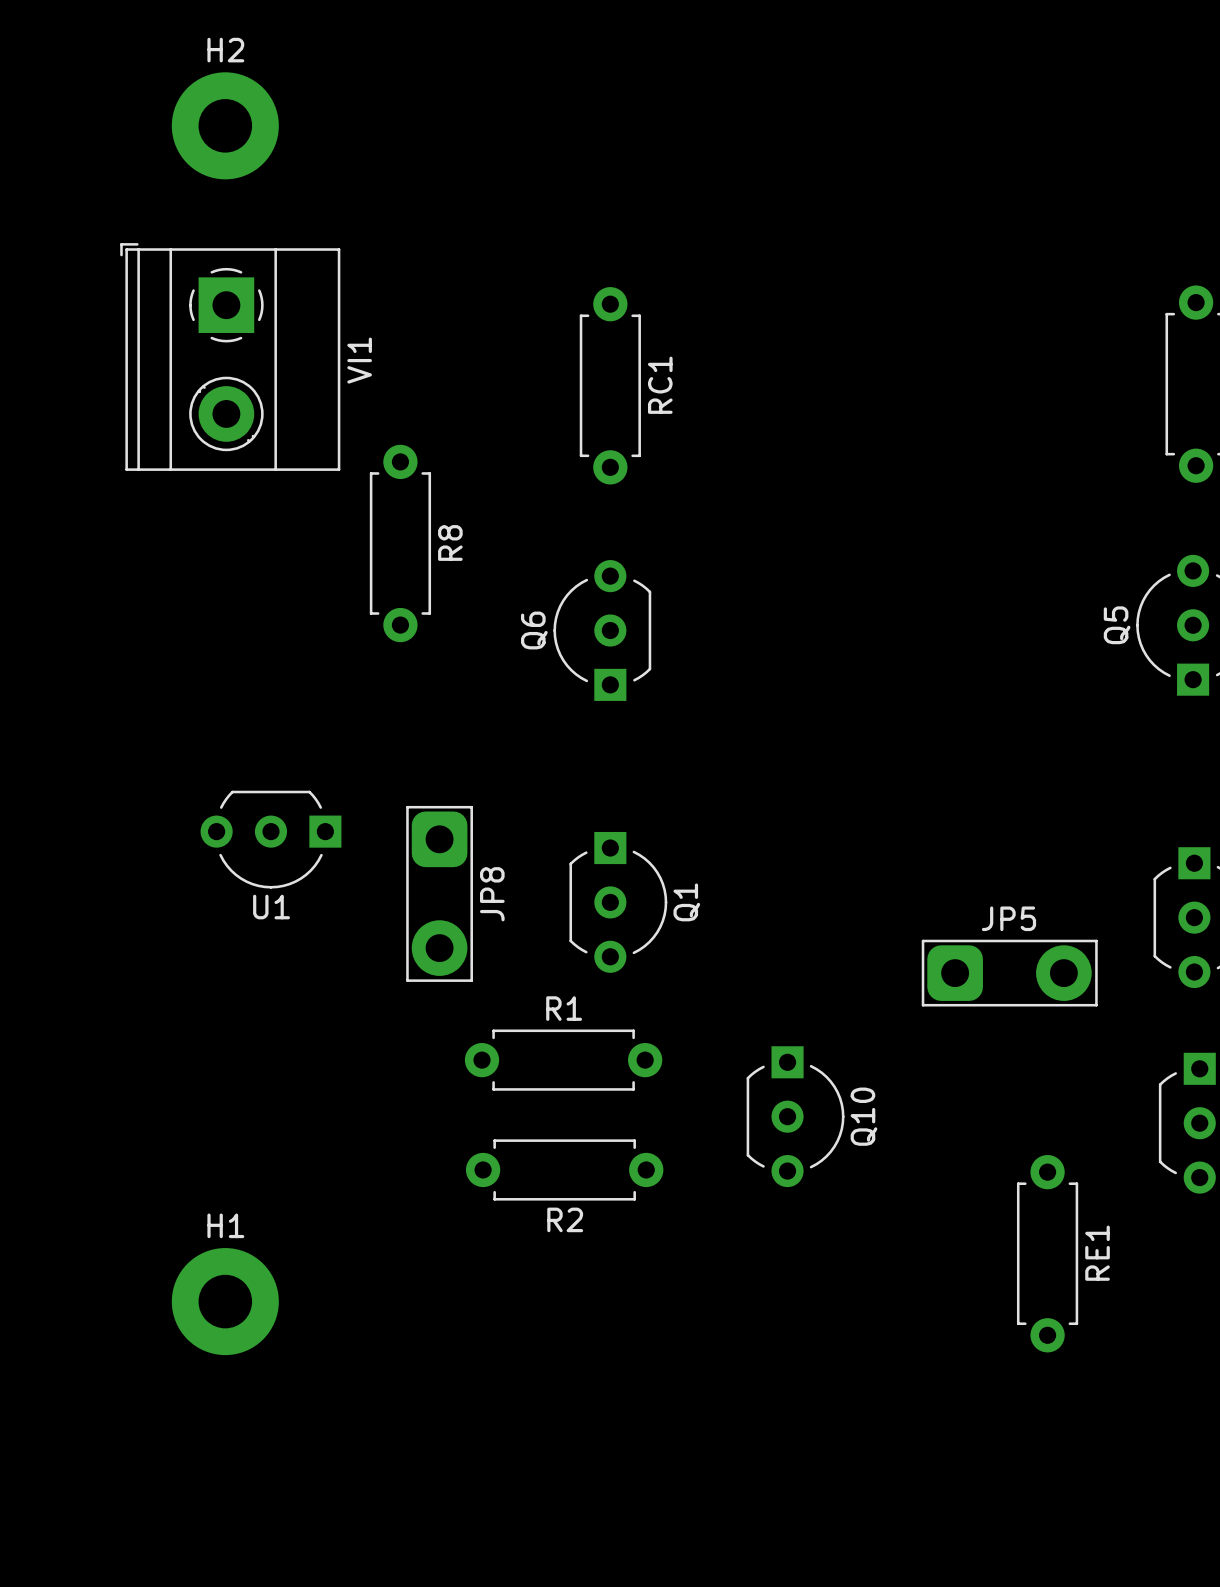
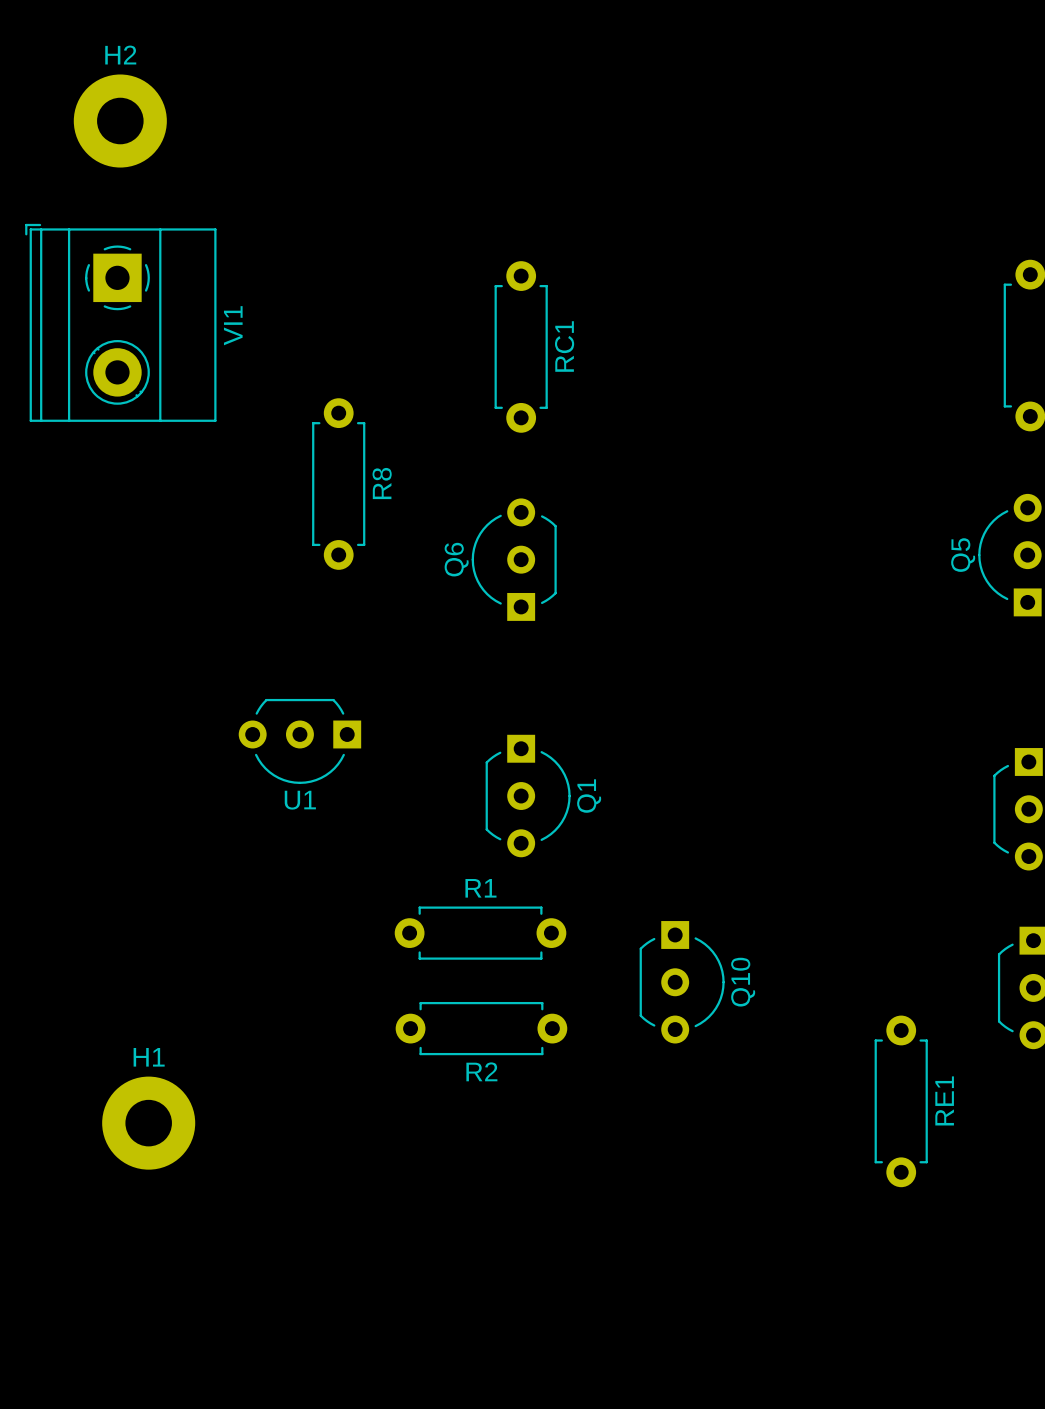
H2 position: (225, 125) -> (120, 121)
VI1 position: (230, 357) -> (120, 322)
U1 position: (271, 839) -> (299, 741)
JP8: (439, 893) -> none
JP5: (1009, 973) -> none
H1 position: (225, 1301) -> (148, 1123)

